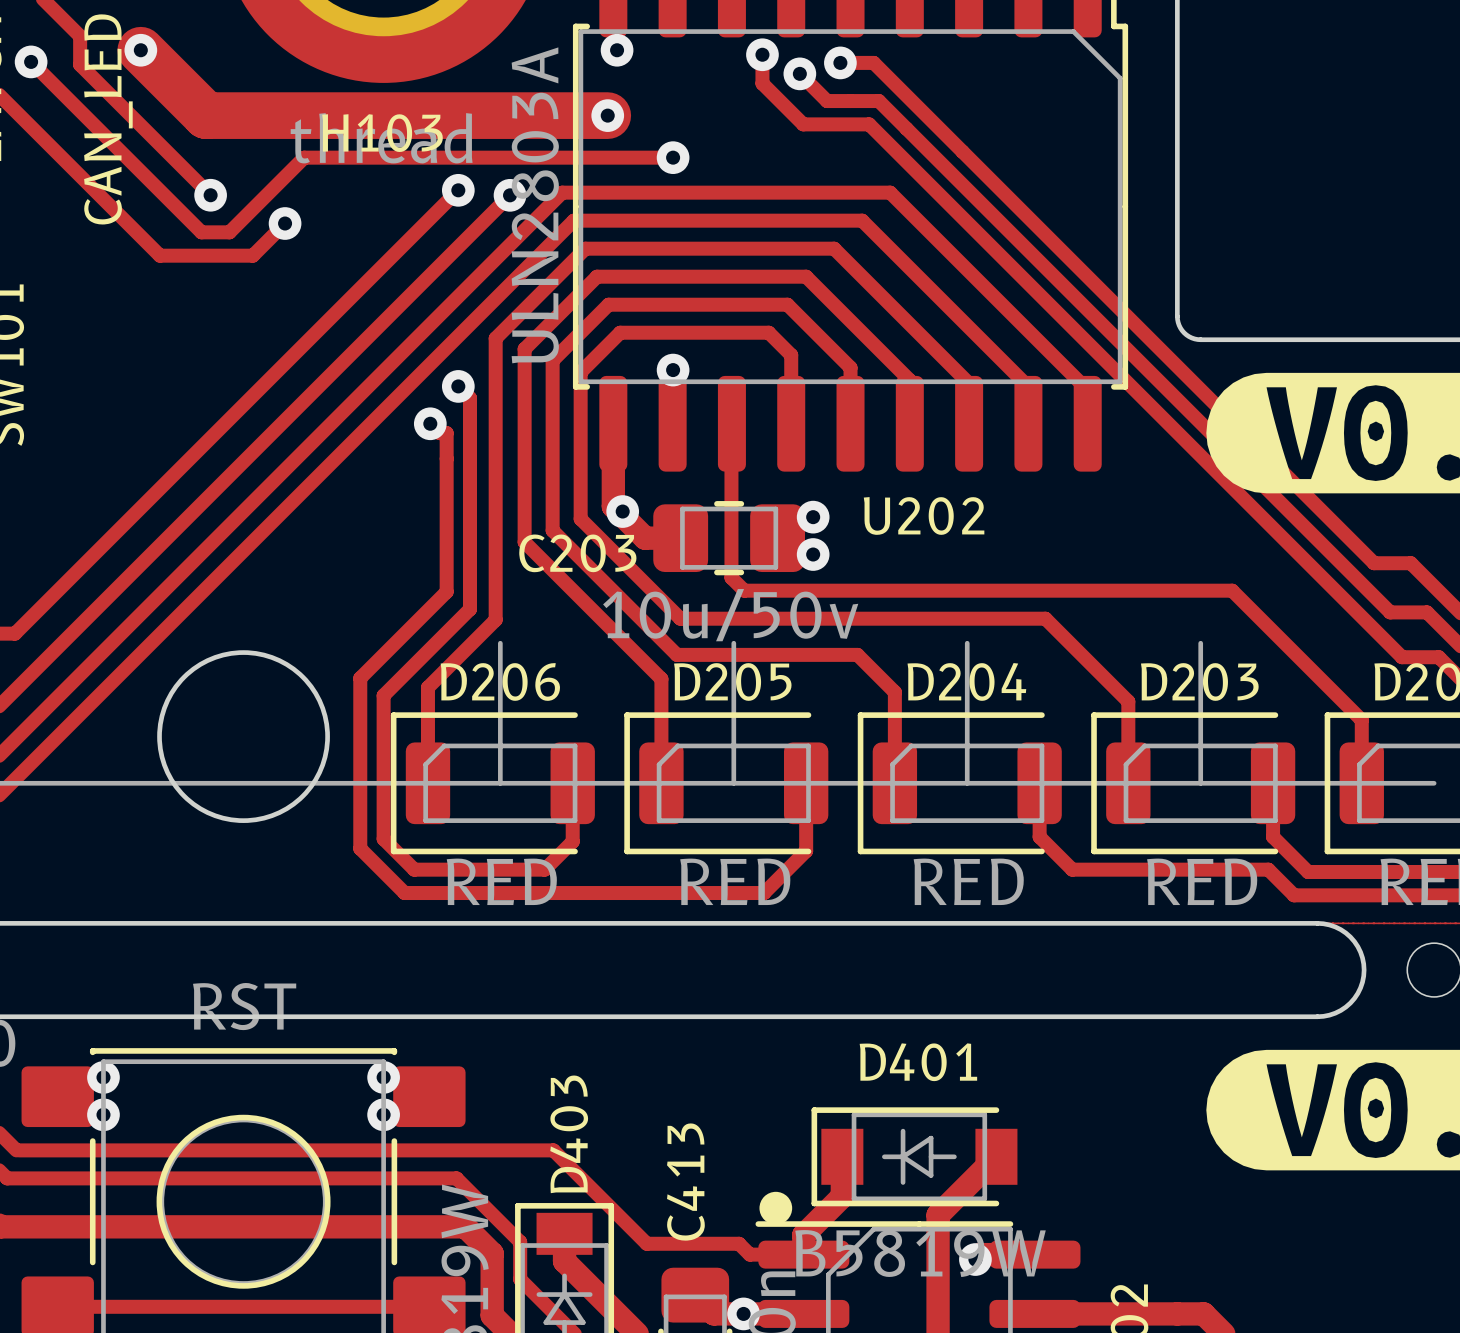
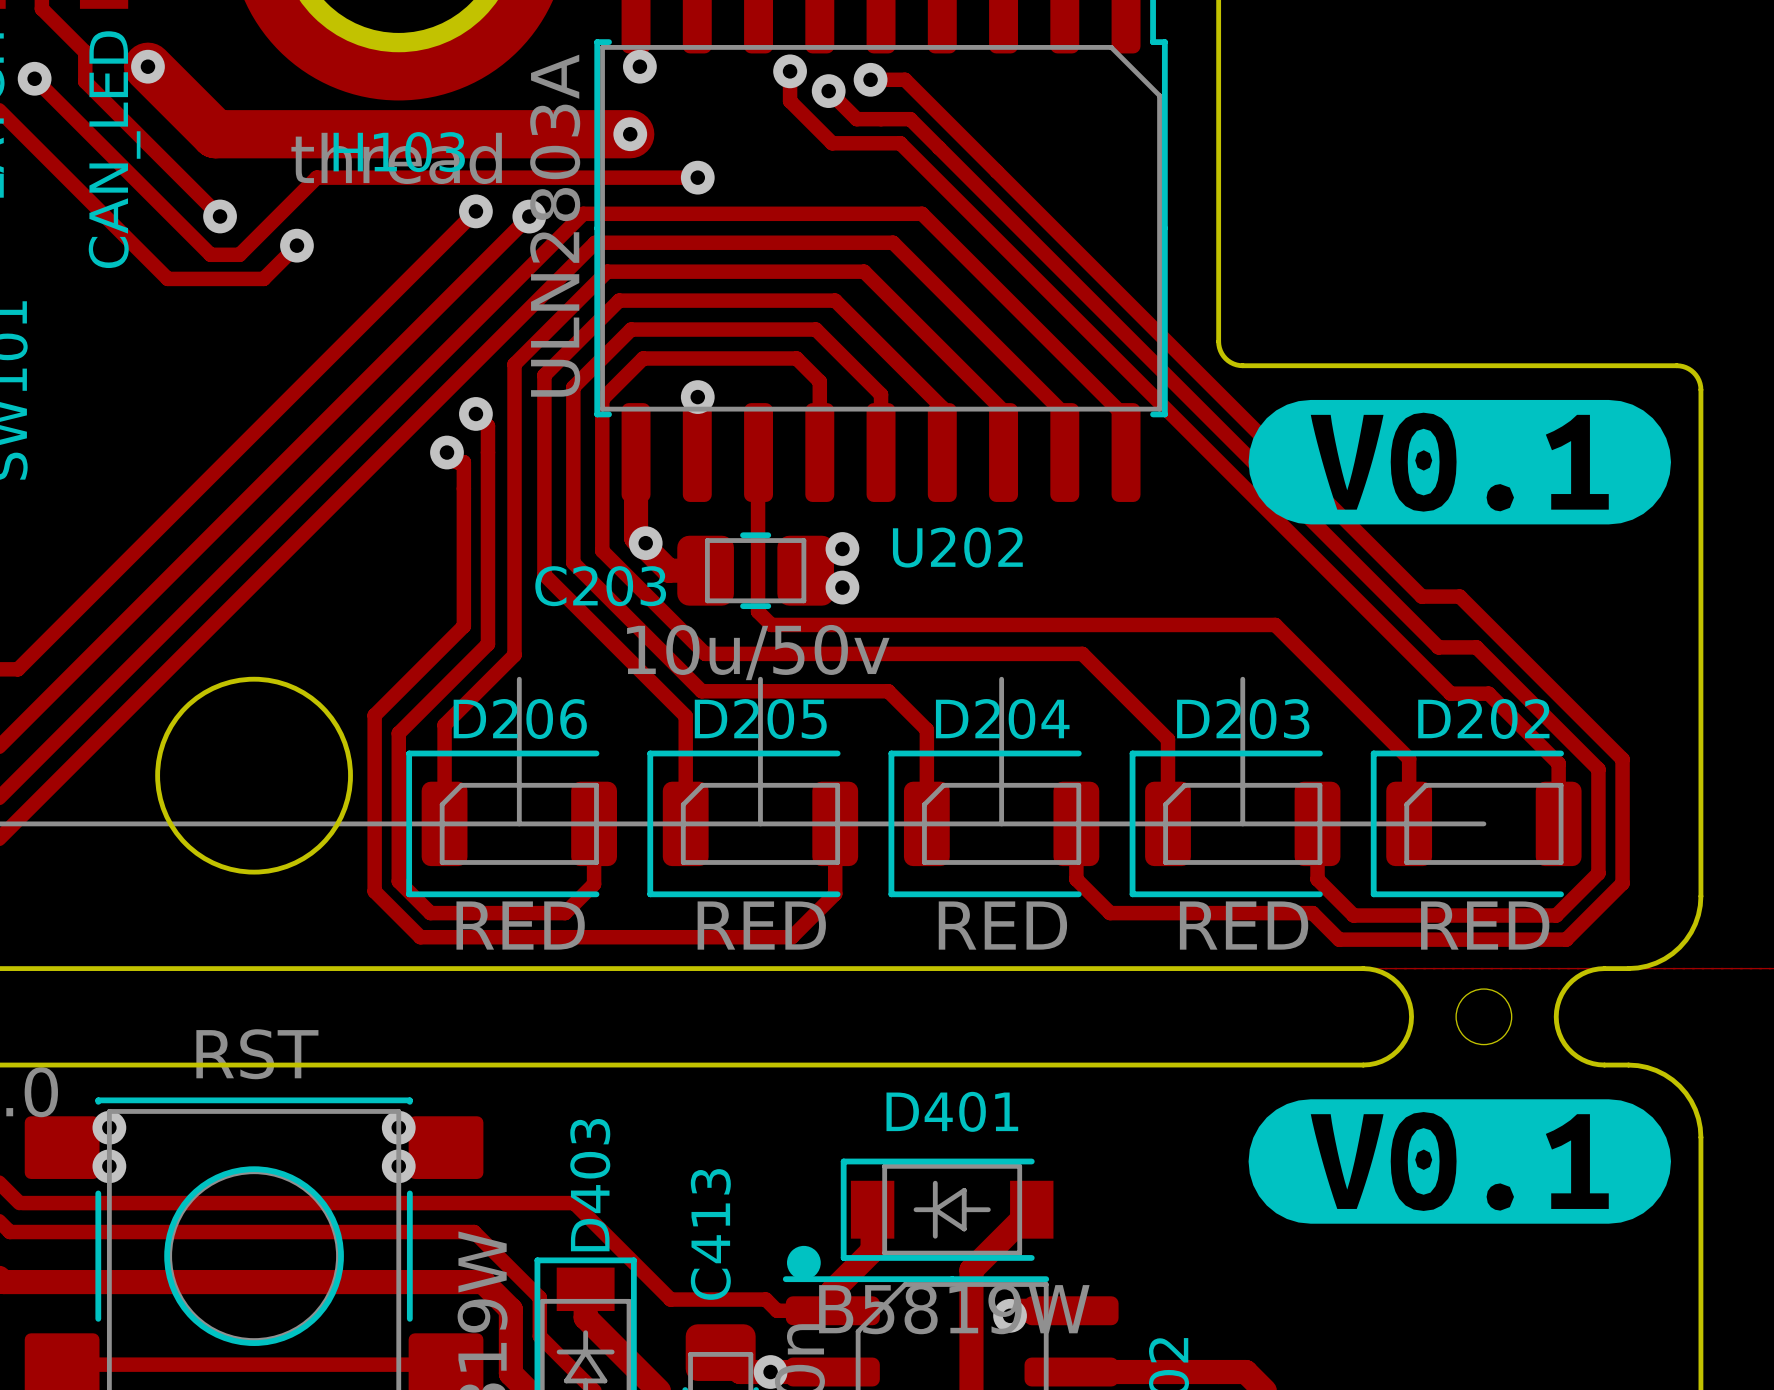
round board edge size: [157, 650, 330, 823] -> [155, 676, 353, 875]

